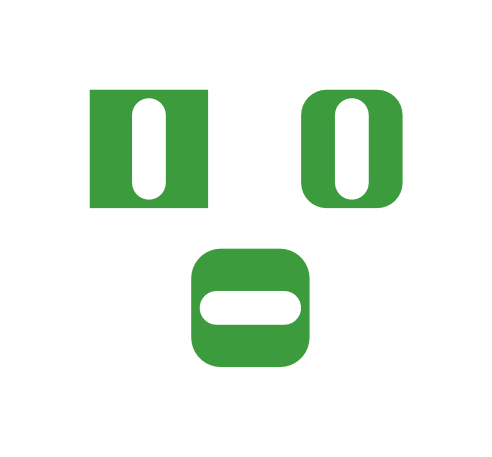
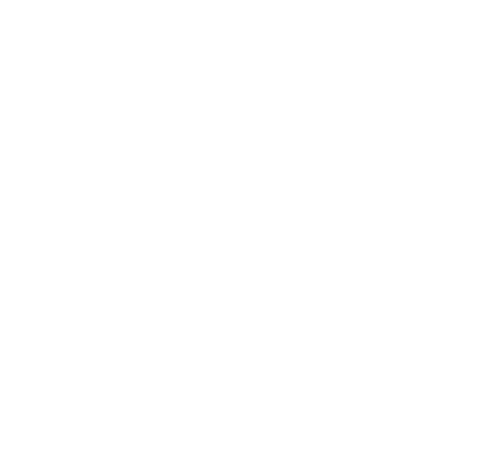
part: (246, 228) -> none

